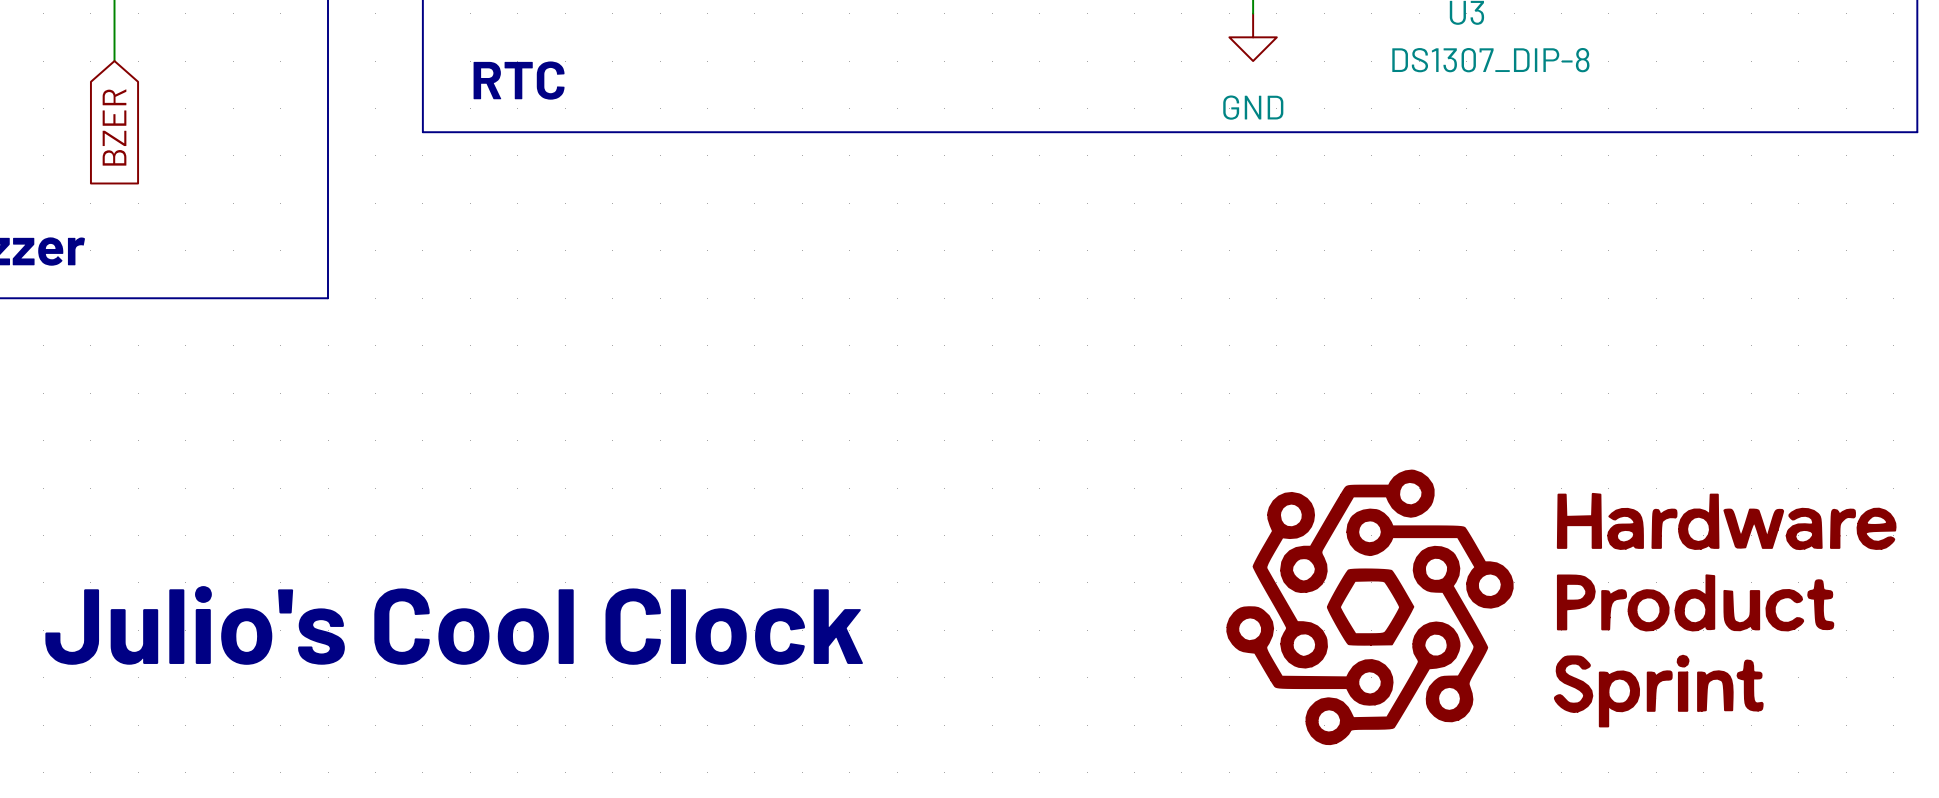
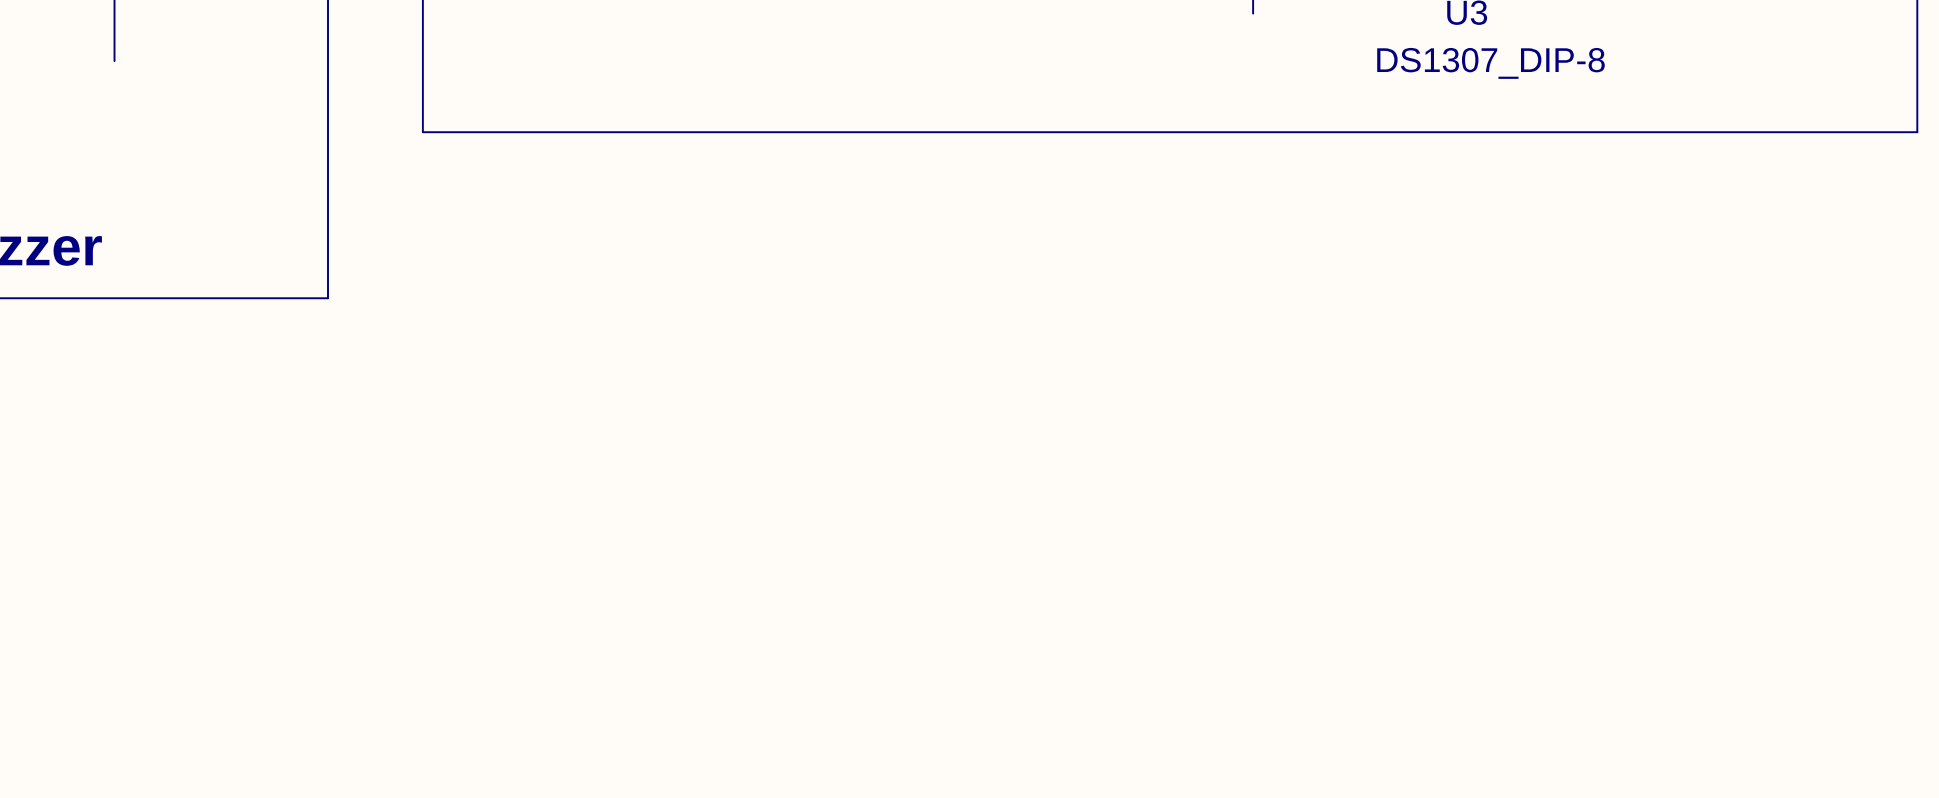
power symbol: GND (1253, 37) -> none
text: RTC (519, 80) -> none
global label: BZER (114, 127) -> none
drawing: [1227, 470, 1896, 745] -> none
text: Julio's Cool Clock (454, 625) -> none

